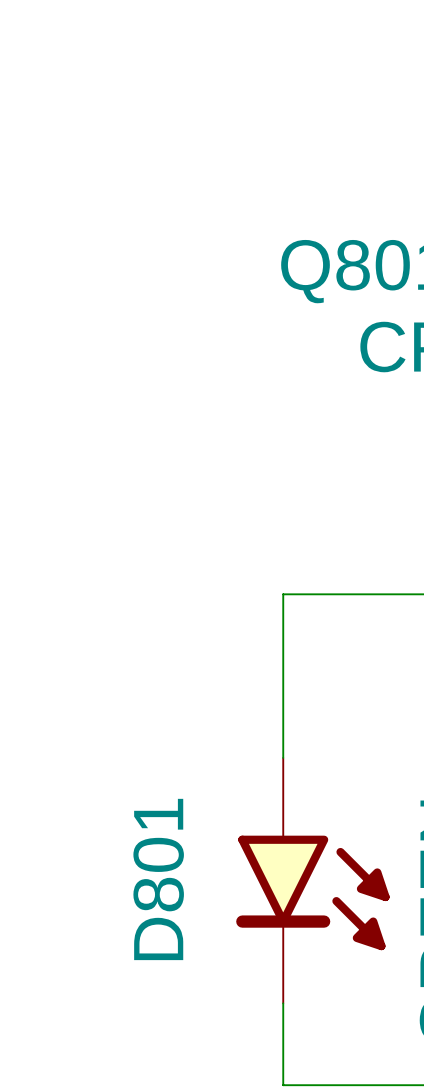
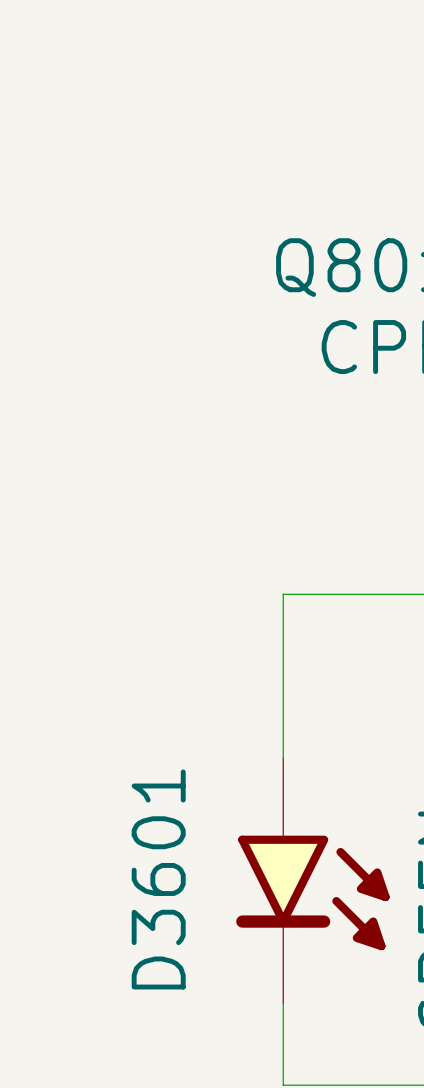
D801 name: D801 (158, 879) -> D3601 (158, 879)

